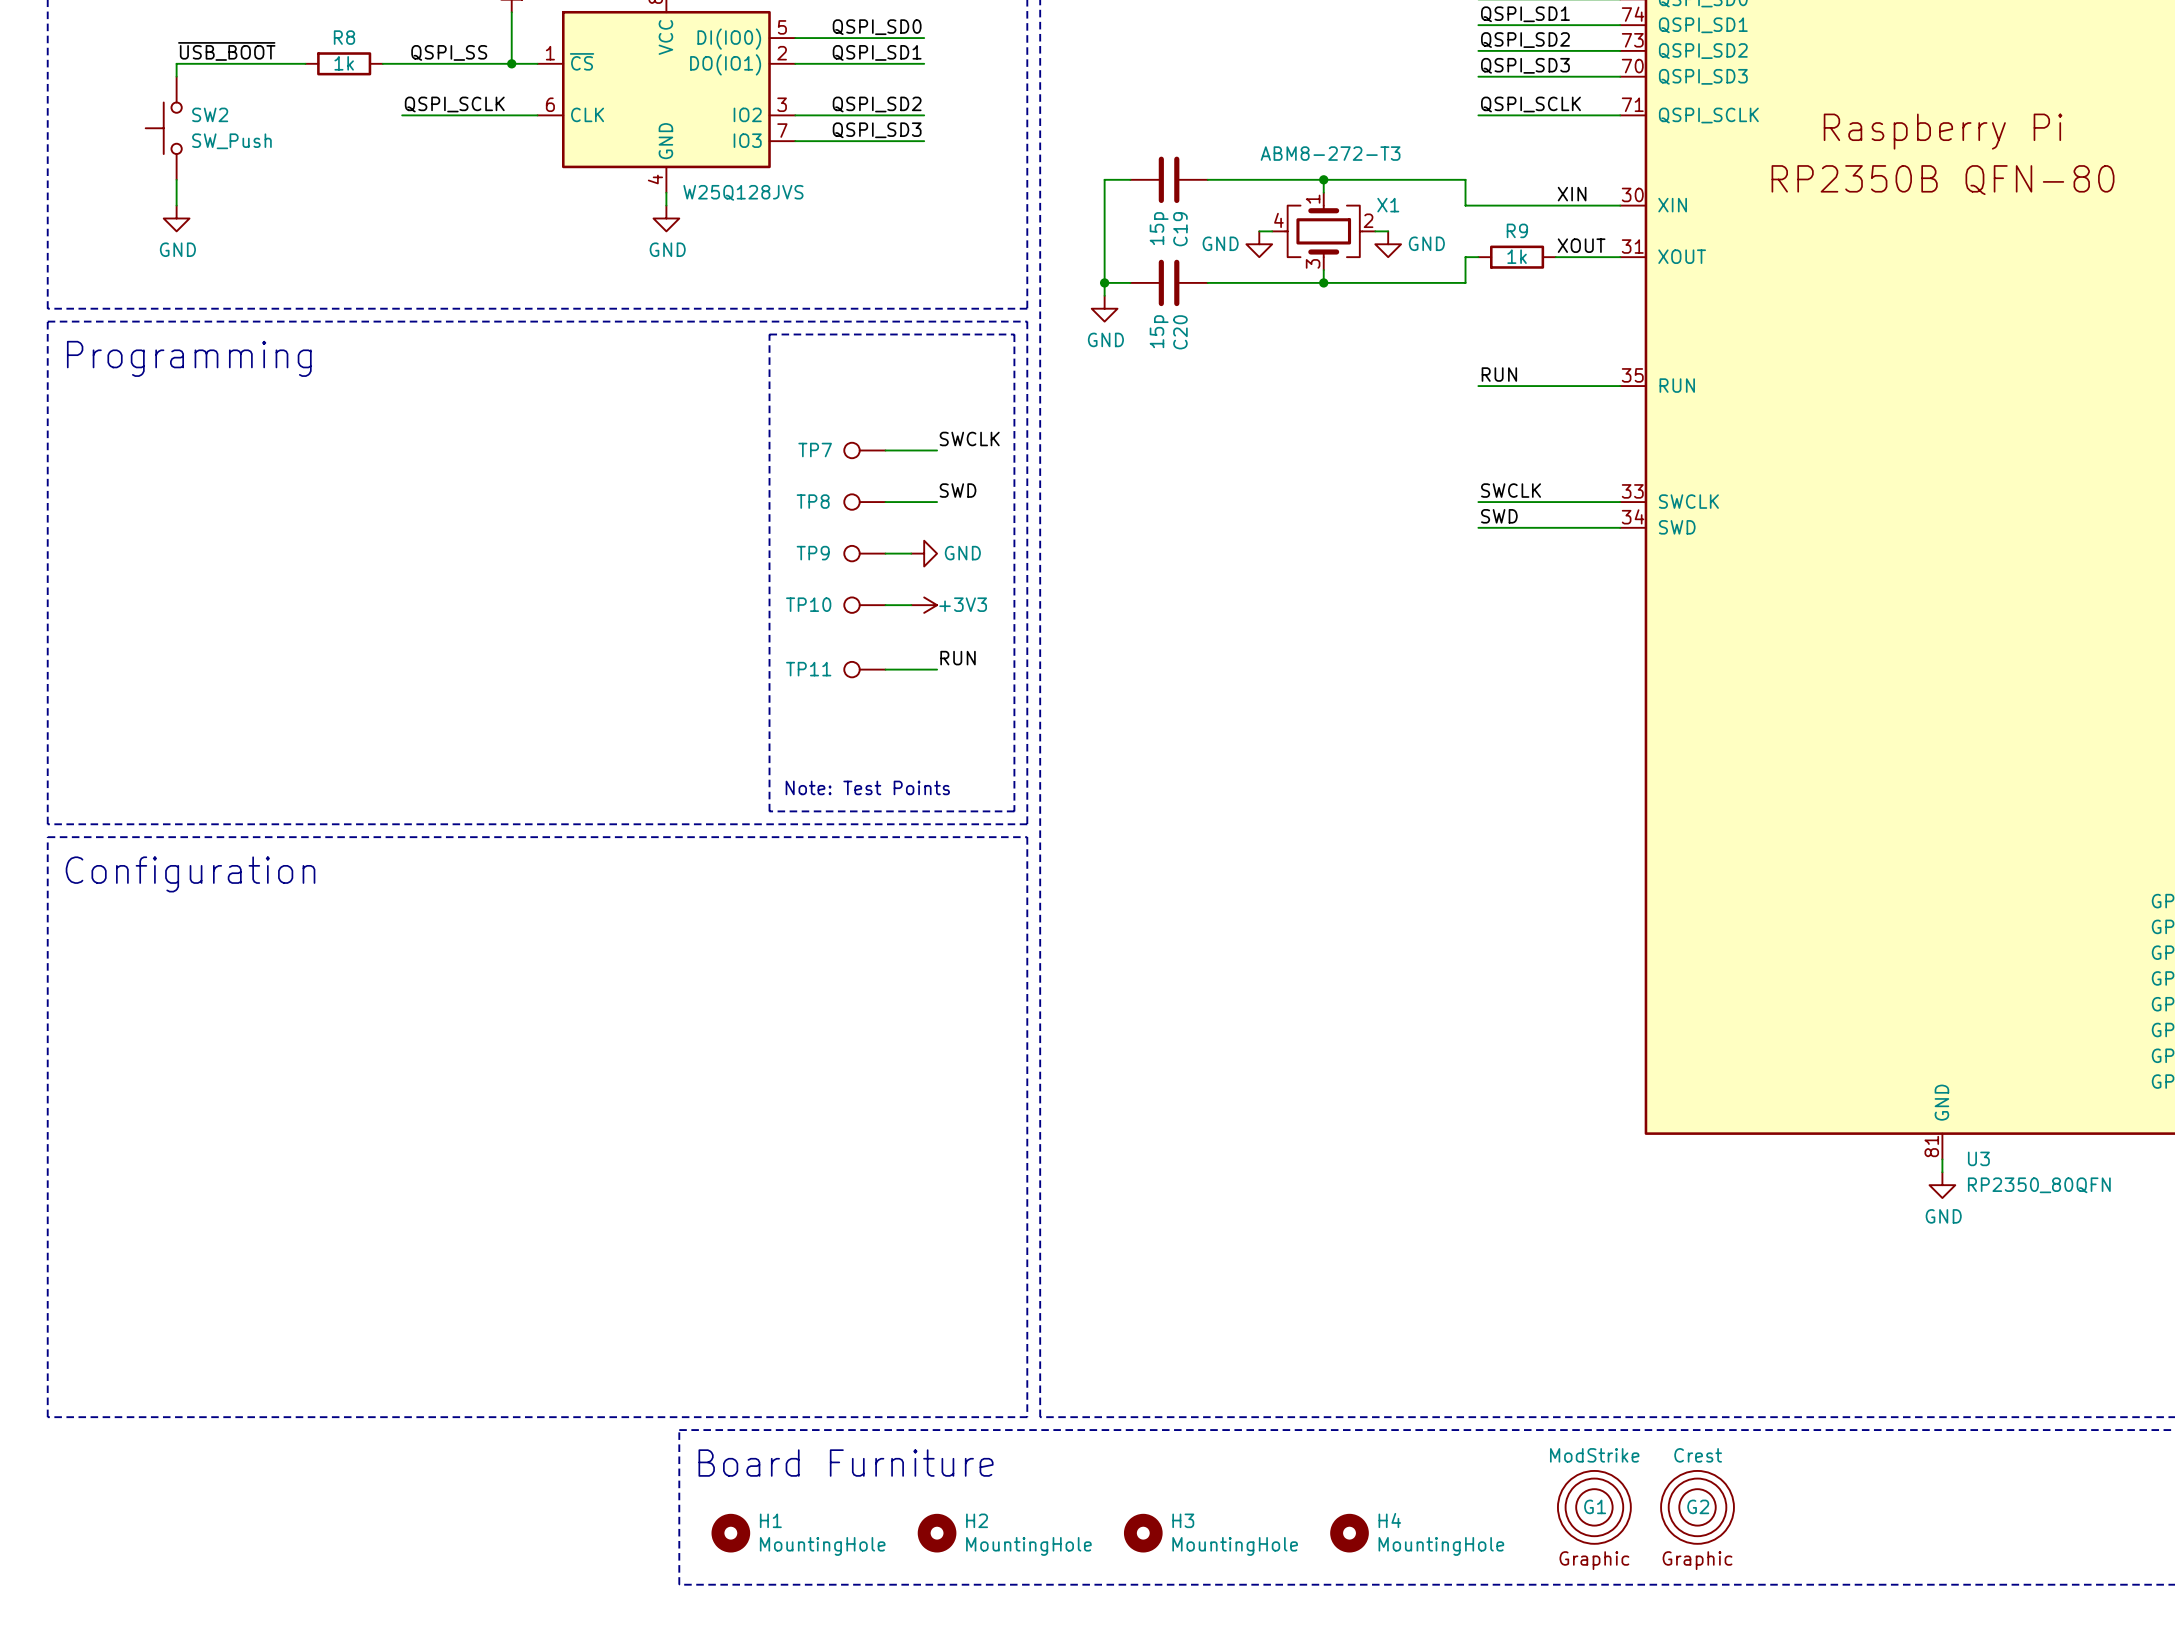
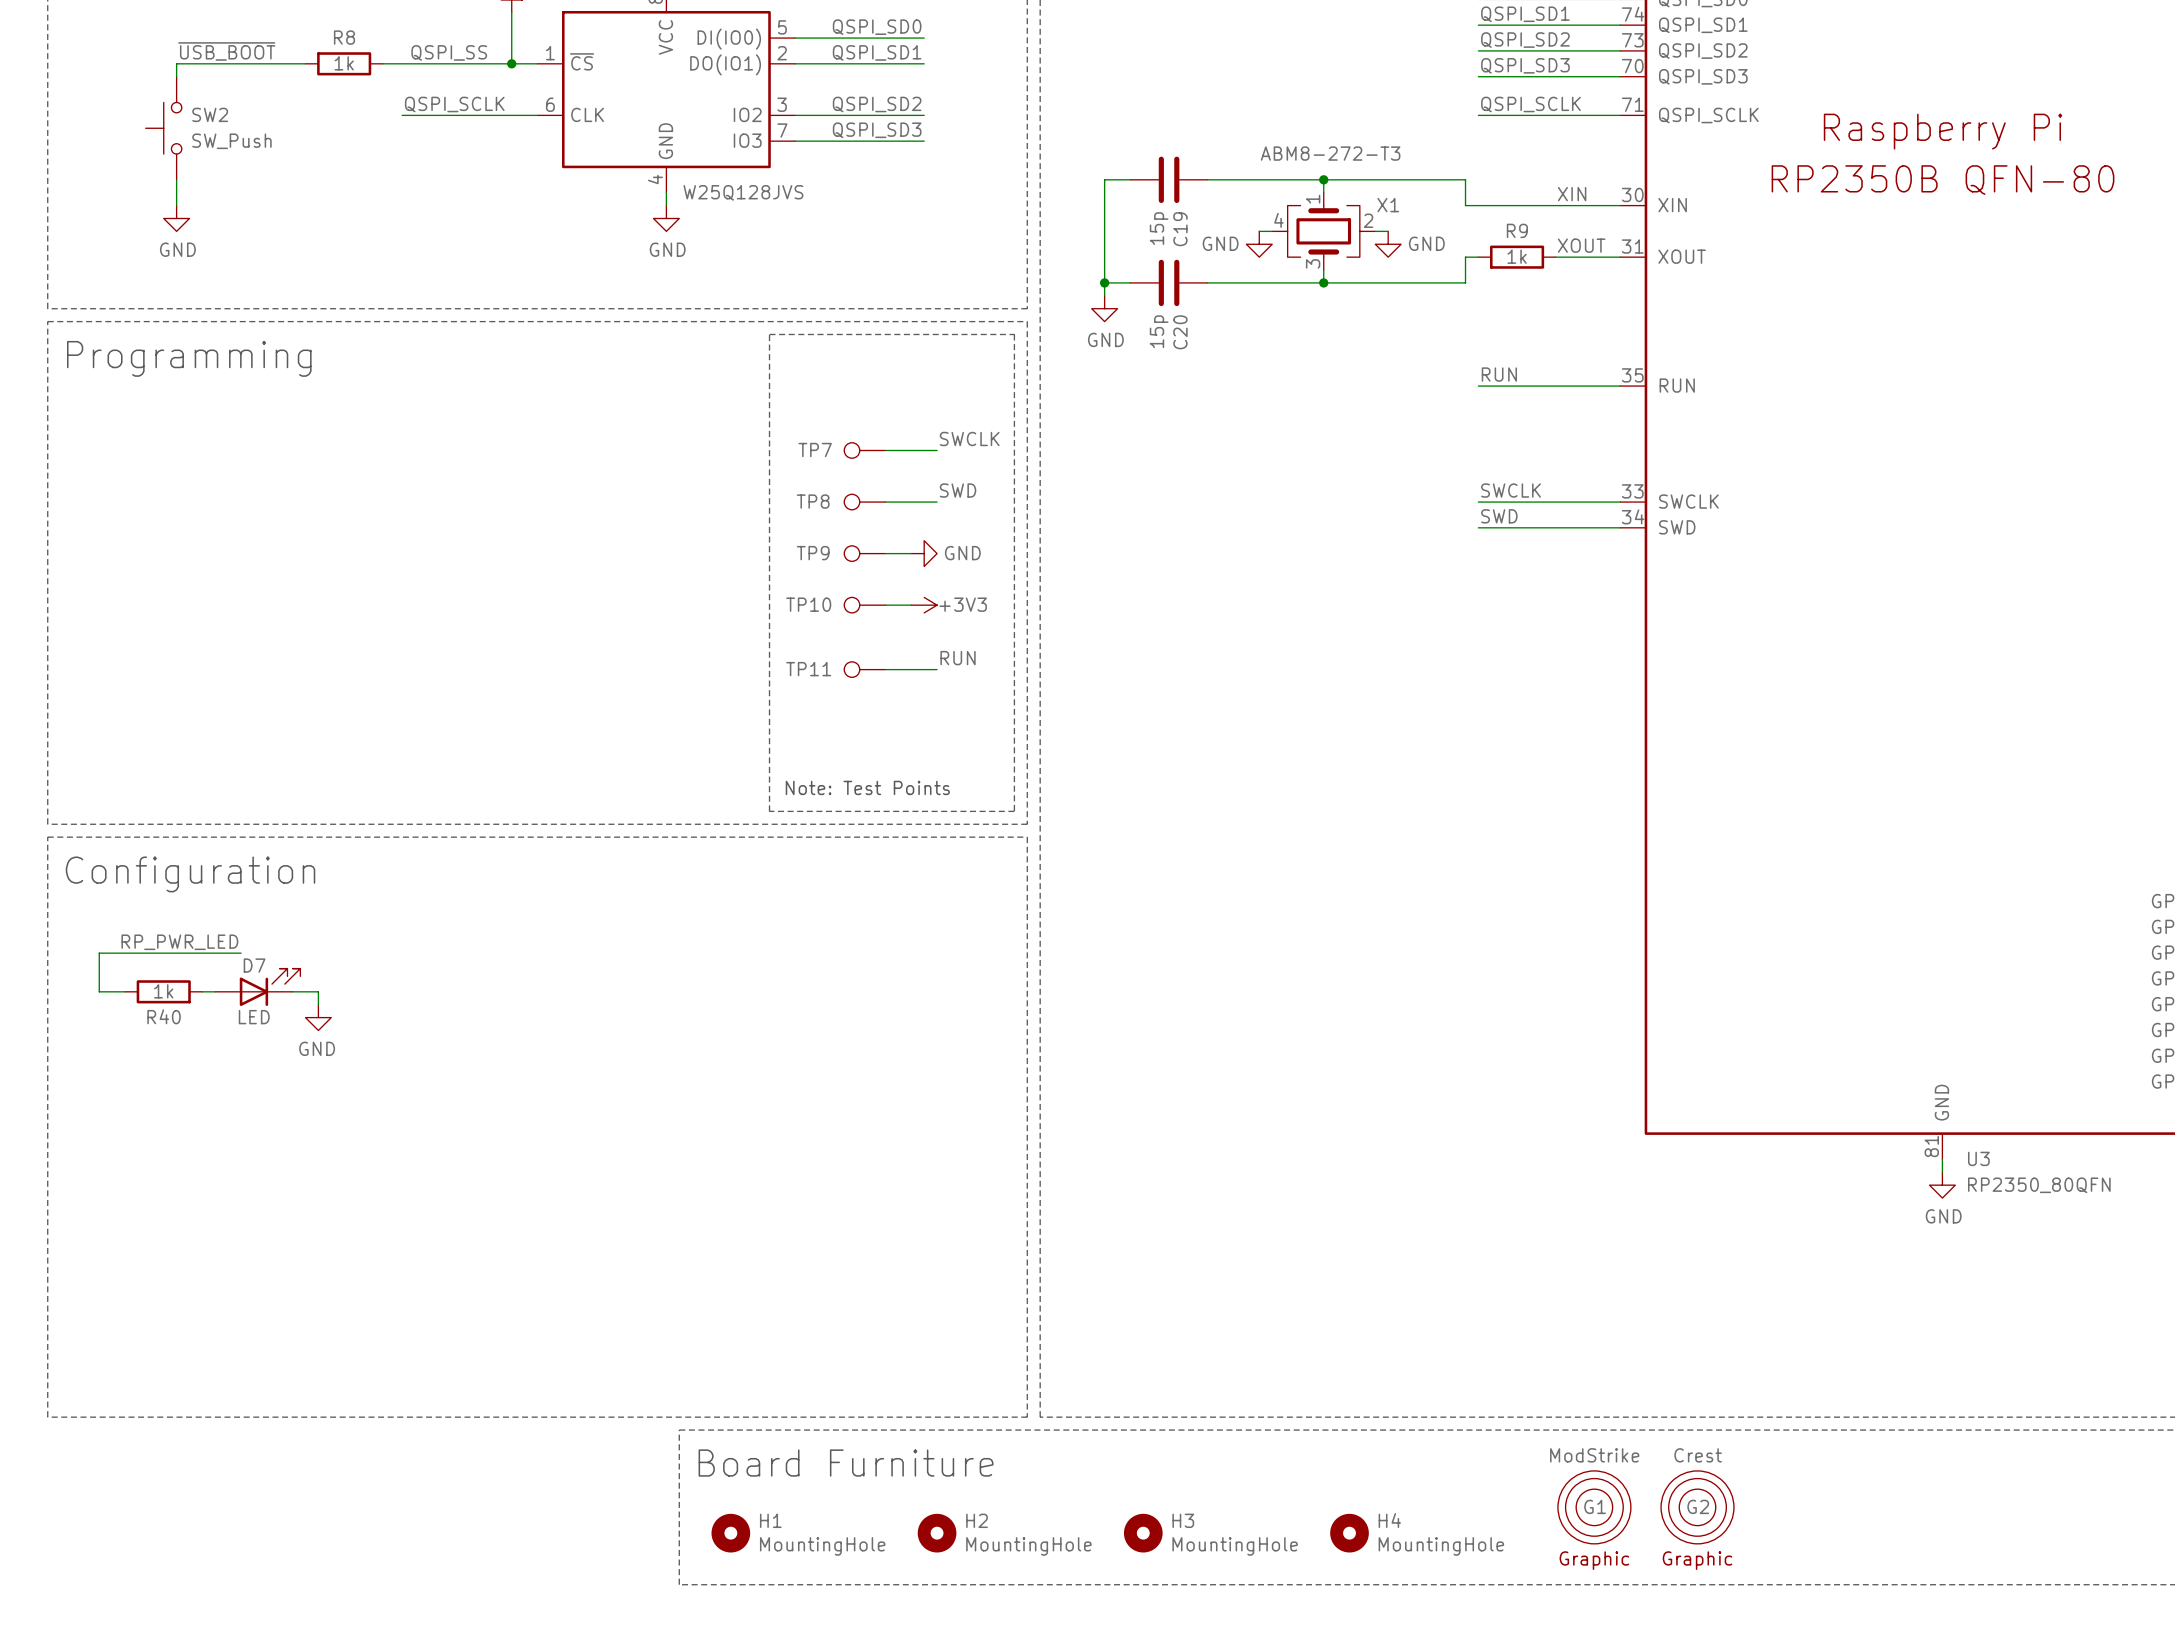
label: none -> RP_PWR_LED (179, 942)
wire: none -> (241, 953) (99, 953) (99, 991) (125, 991)
D7: none -> LED (257, 987)
R40: none -> 1k (163, 991)
wire: none -> (202, 991) (215, 991)
wire: none -> (292, 991) (318, 991) (318, 1004)
power symbol: none -> GND (318, 1017)

